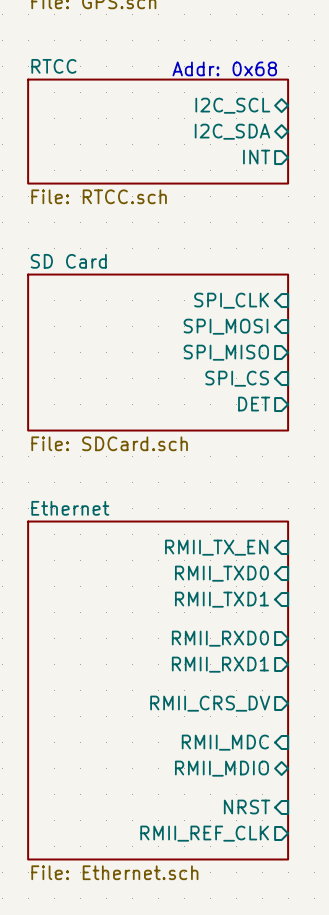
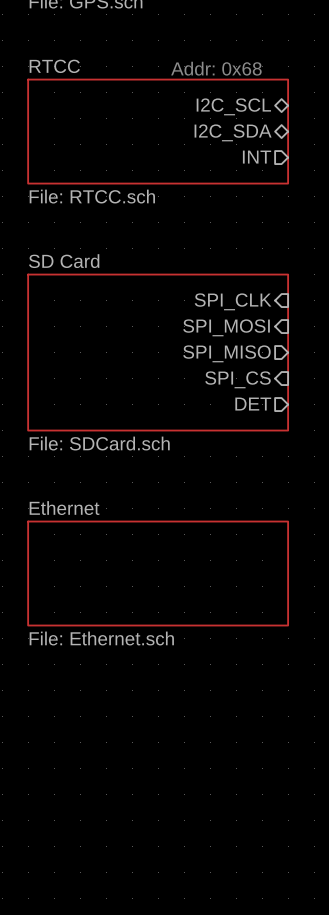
sheet pin: RMII_TX_EN (216, 547) -> none
sheet Ethernet: none -> File: Ethernet.sch (158, 573)
sheet pin: RMII_TXD0 (221, 573) -> none
sheet pin: RMII_TXD1 (221, 599) -> none
sheet pin: RMII_RXD0 (220, 638) -> none
sheet pin: RMII_RXD1 (220, 664) -> none
sheet Ethernet: File: Ethernet.sch (158, 690) -> none
sheet pin: RMII_CRS_DV (210, 703) -> none
sheet pin: RMII_MDC (225, 742) -> none
sheet pin: RMII_MDIO (221, 768) -> none
sheet pin: NRST (247, 807) -> none
sheet pin: RMII_REF_CLK (204, 833) -> none

